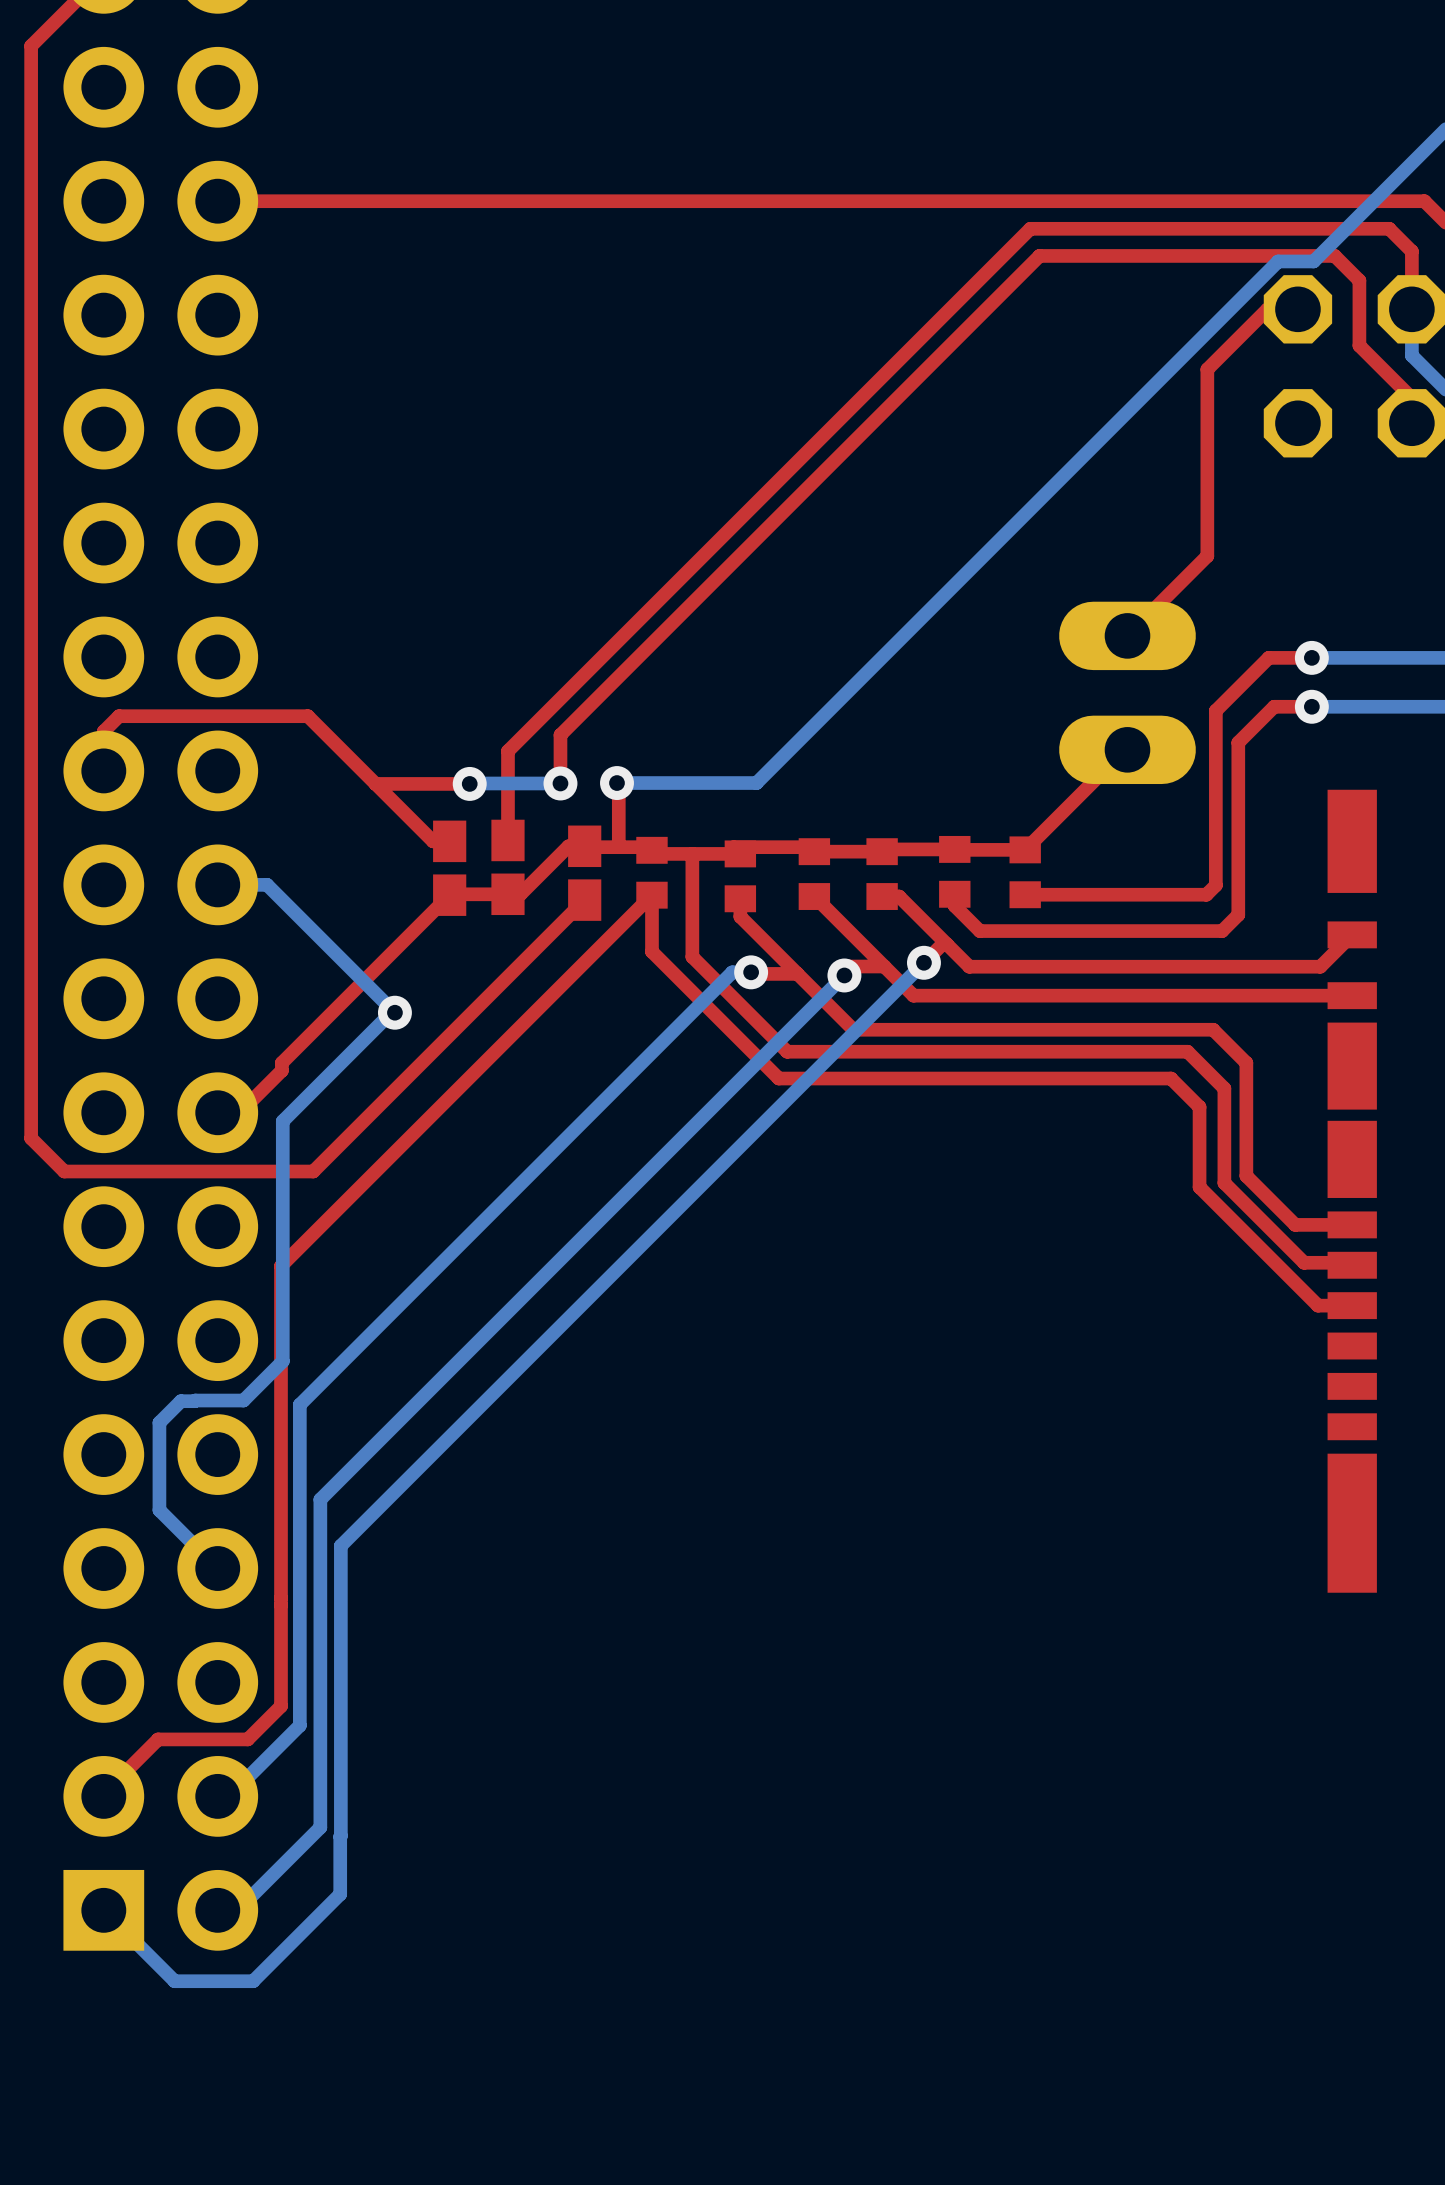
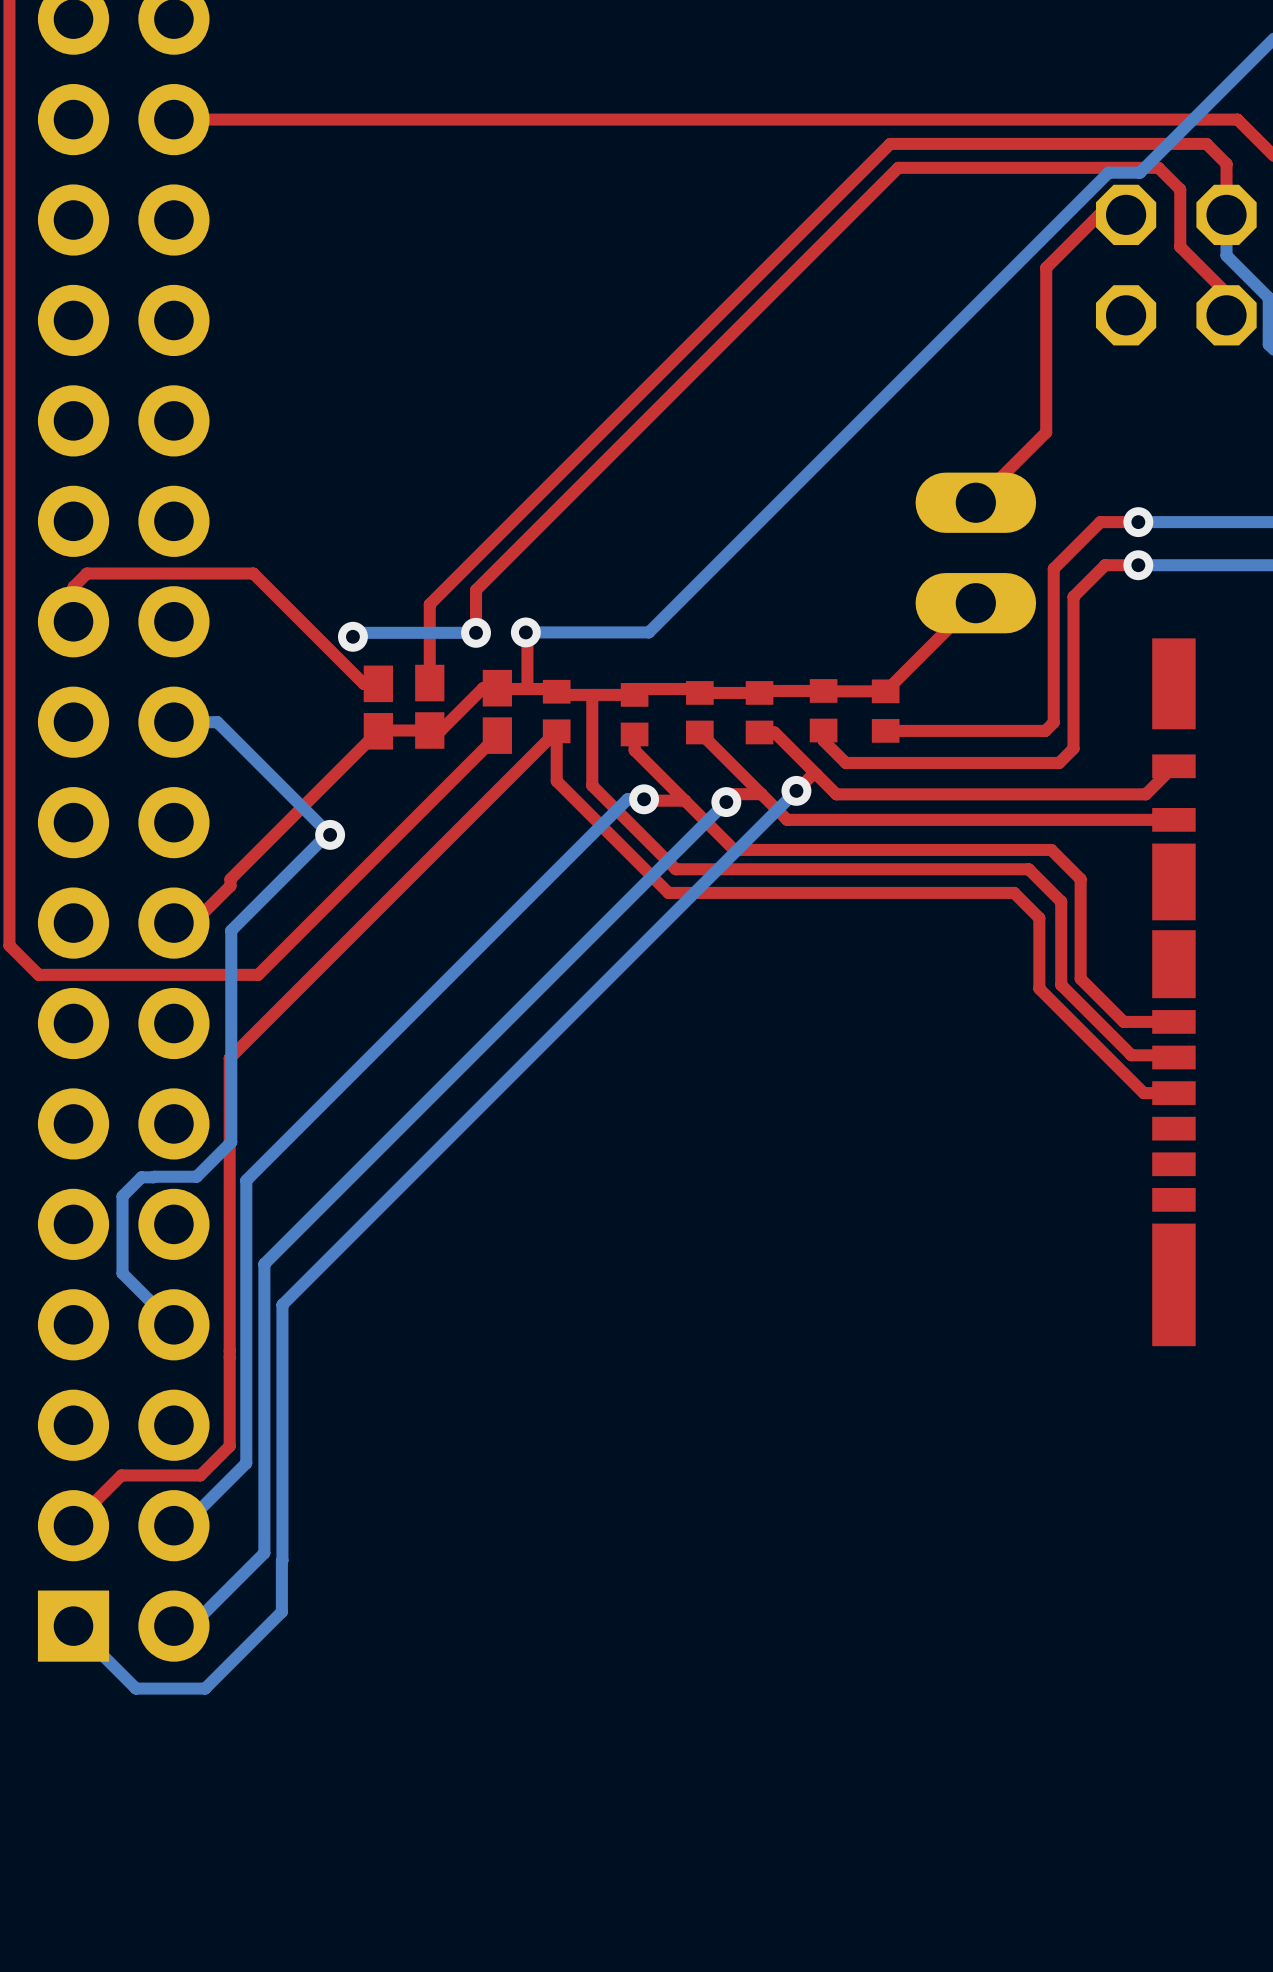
top track: (469, 783) (375, 783) -> none
via position: (469, 783) -> (352, 636)
bottom track: none -> (396, 632) (356, 632) (352, 636)

